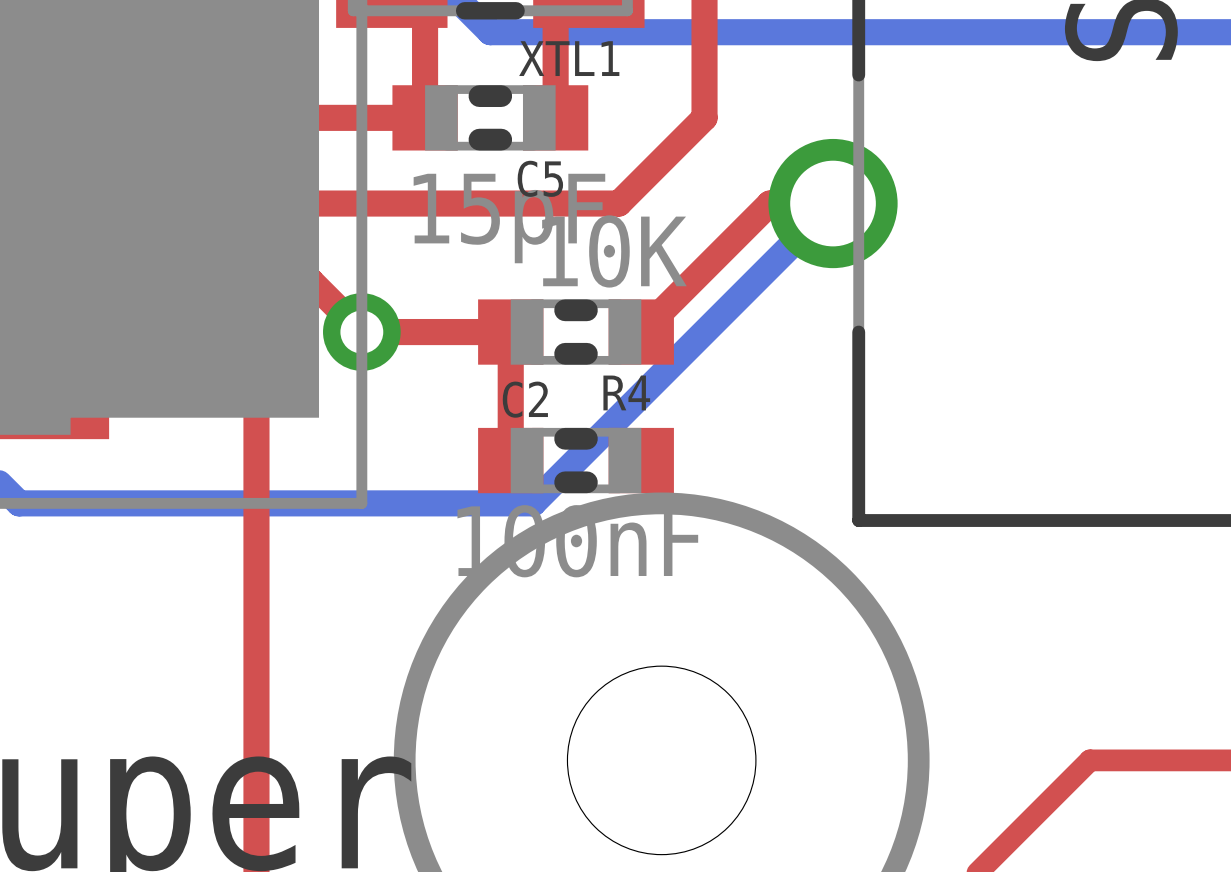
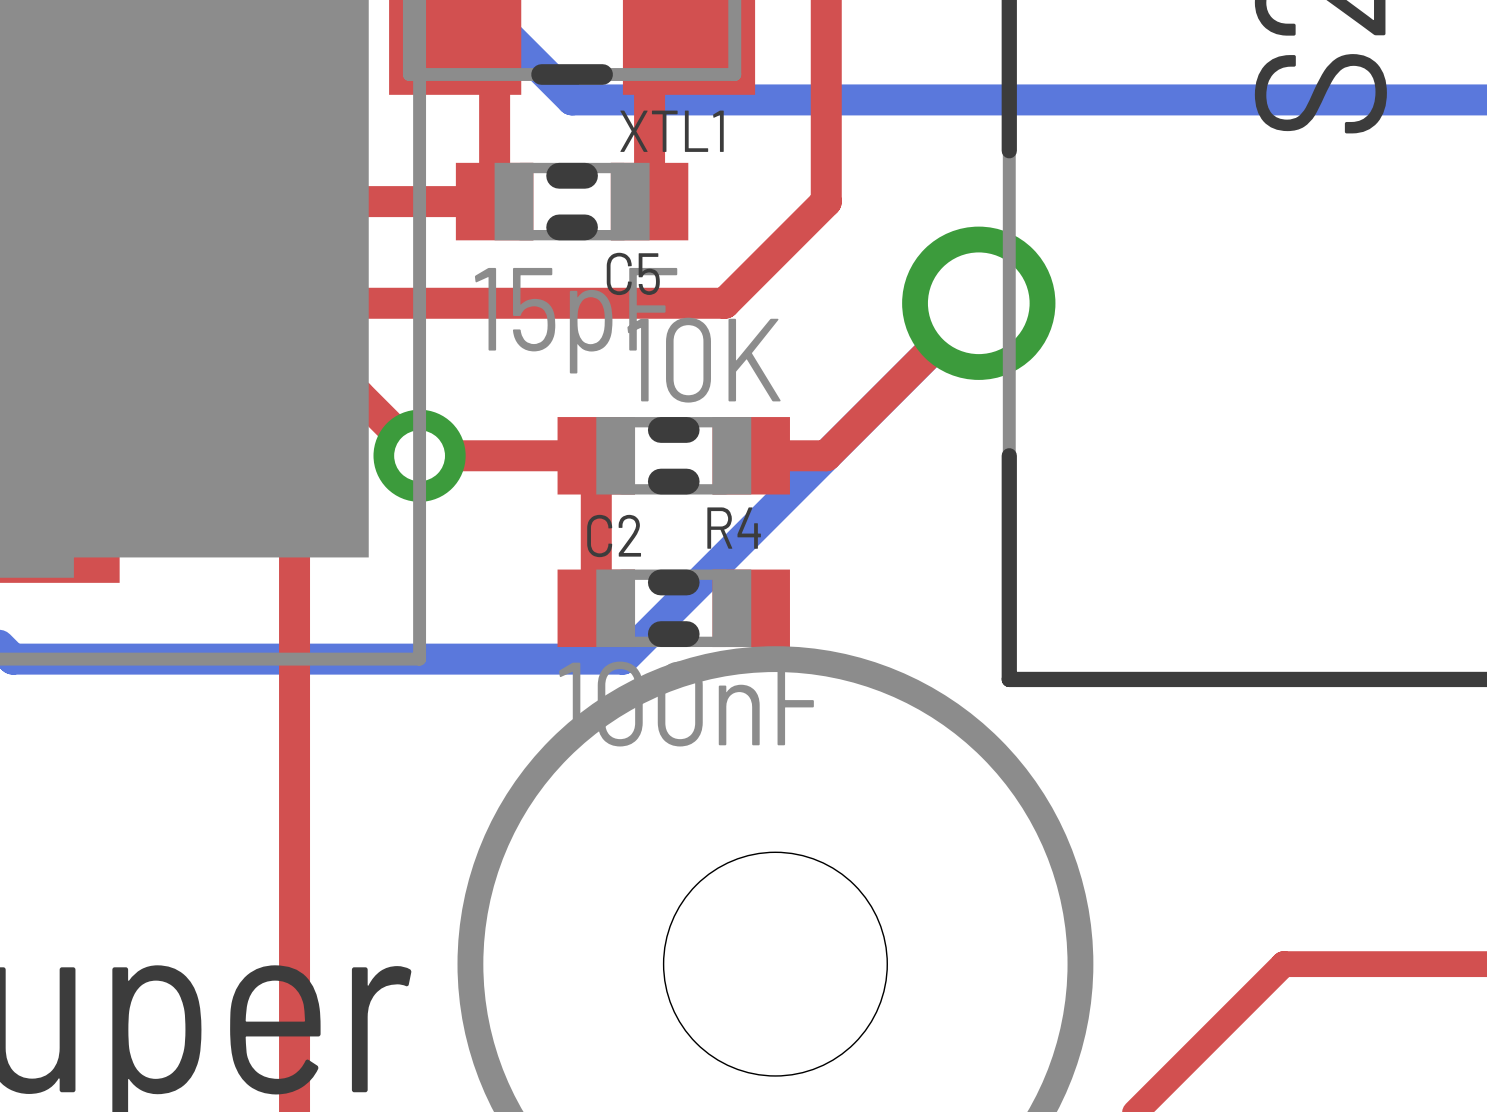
top track: (833, 203) (769, 203) (641, 332) -> (978, 303) (826, 455) (751, 455)

